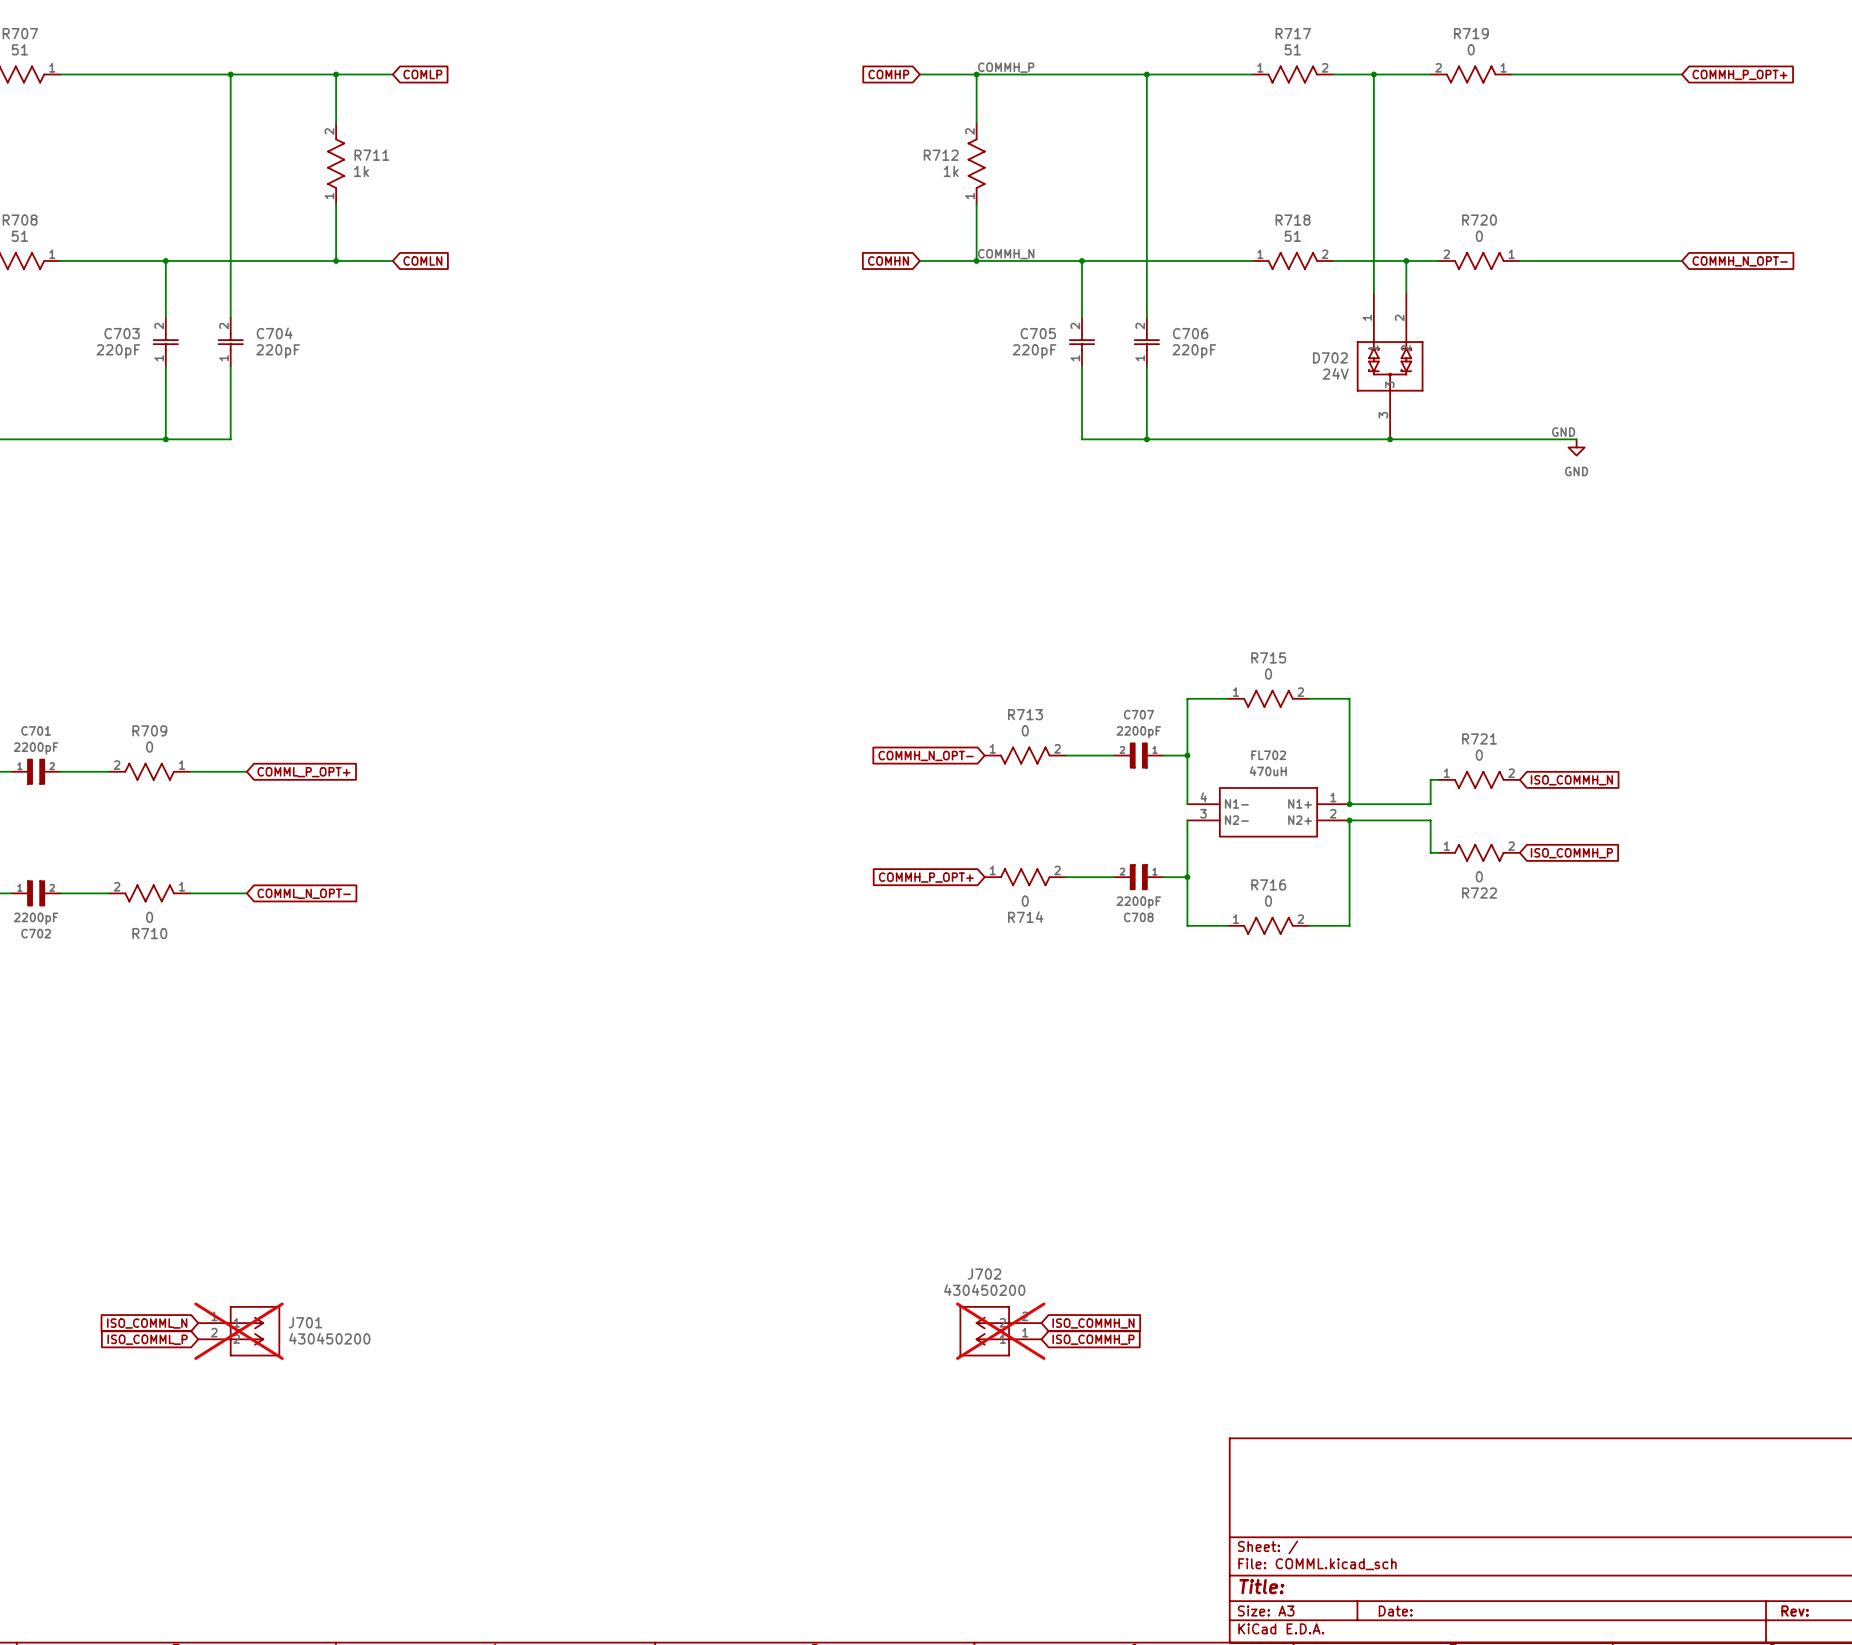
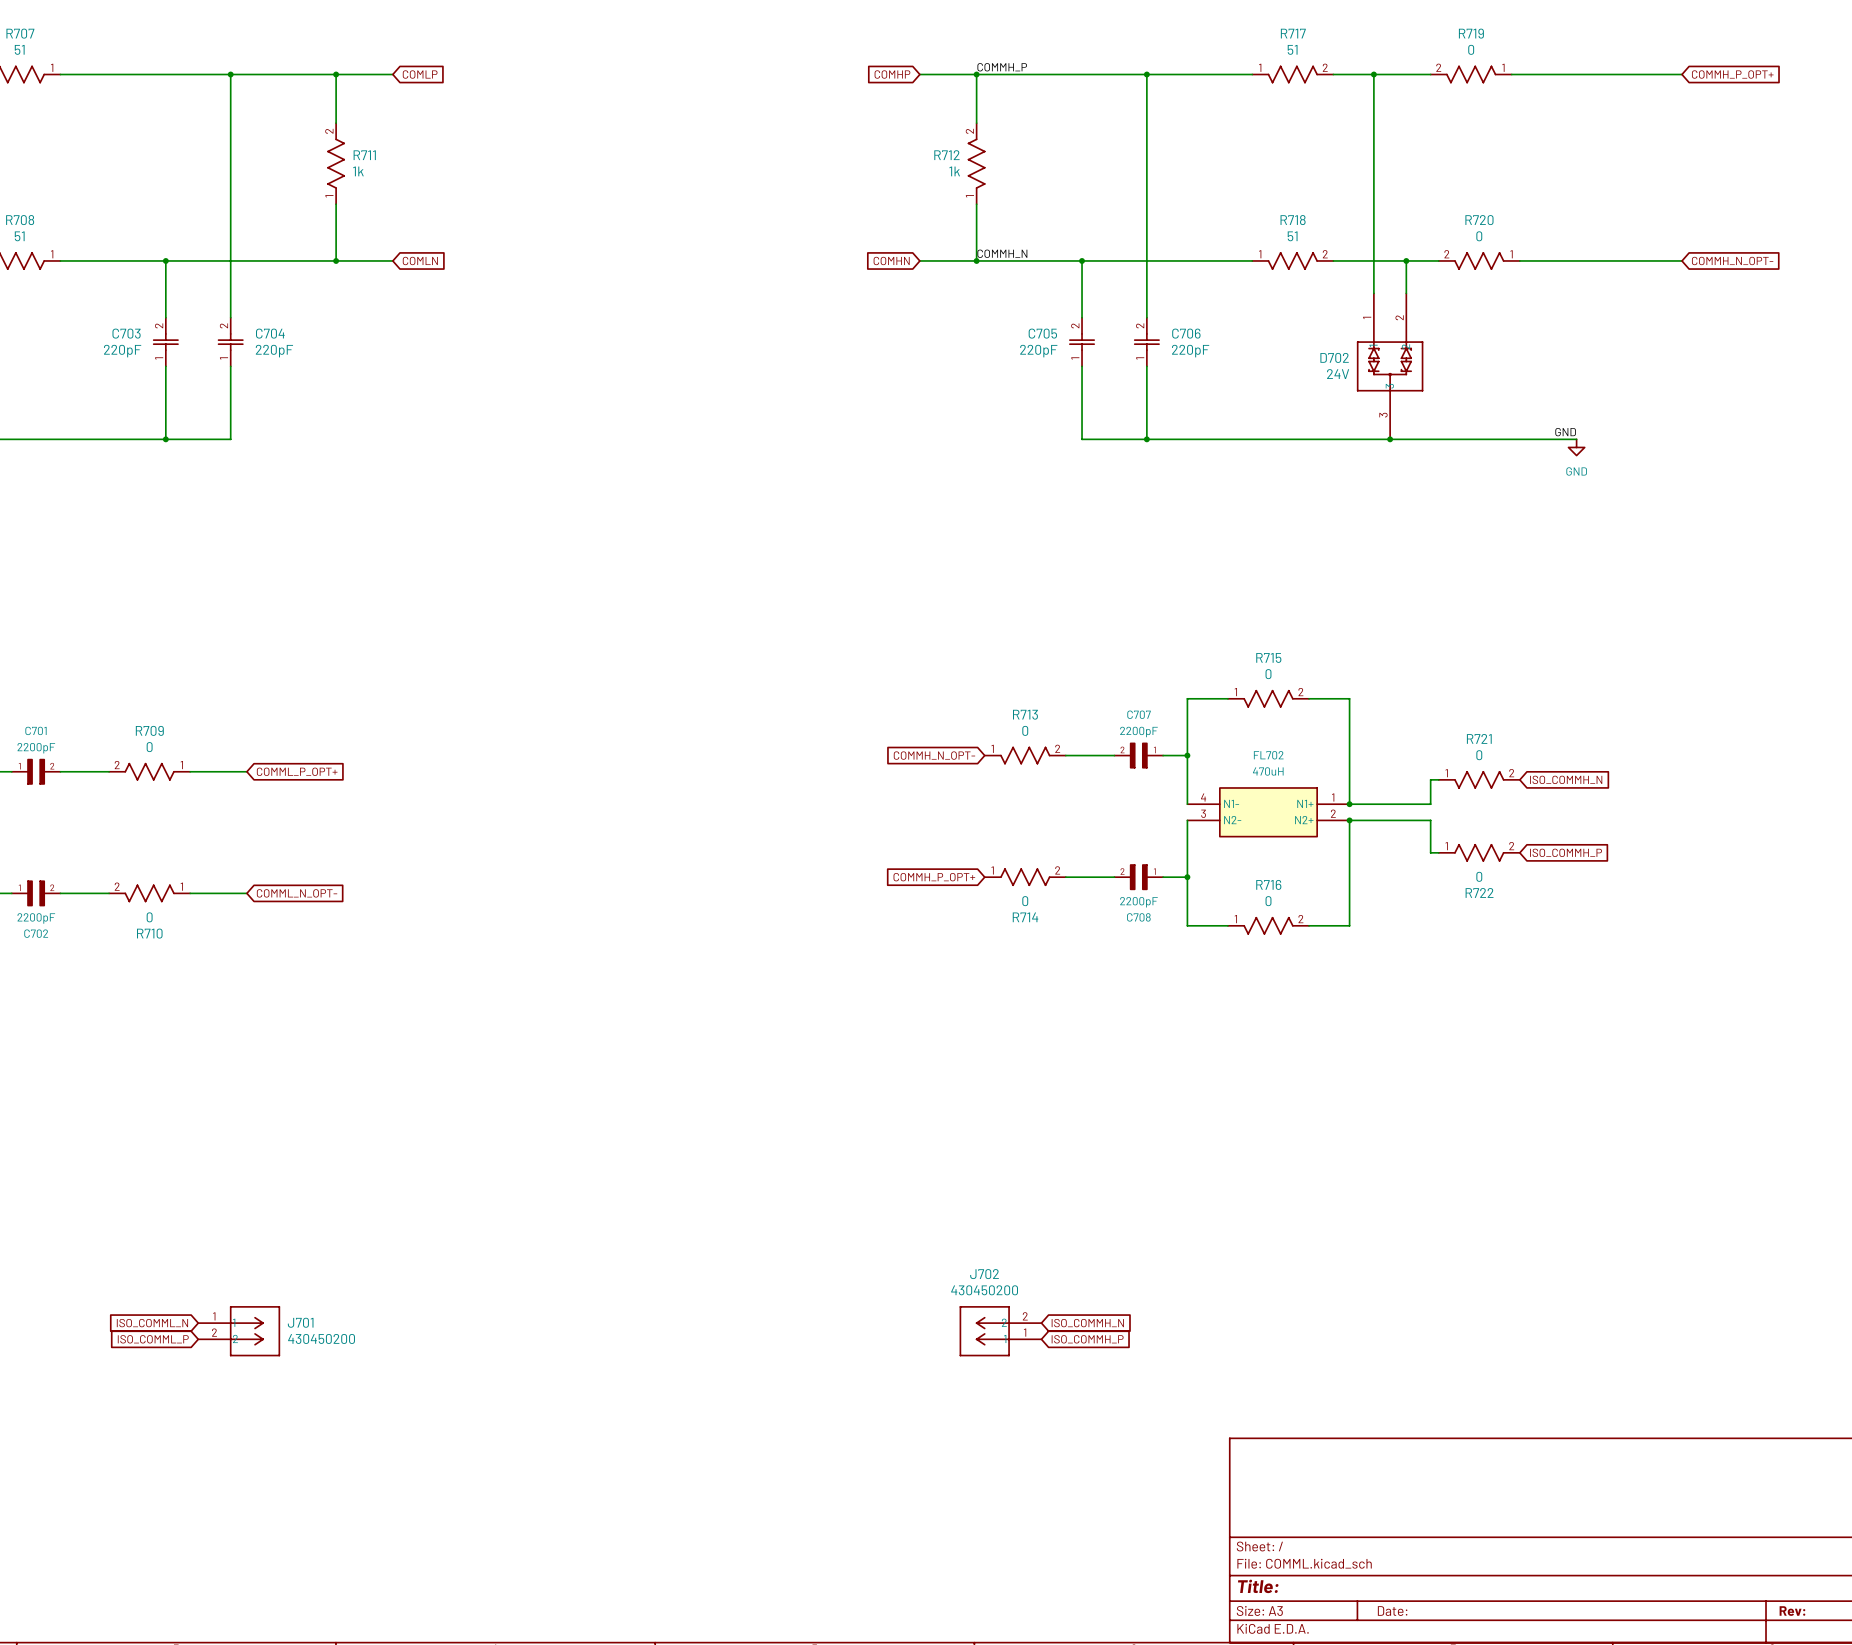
J701 do-not-place cross: (239, 1331) -> none
J702 do-not-place cross: (1000, 1331) -> none

